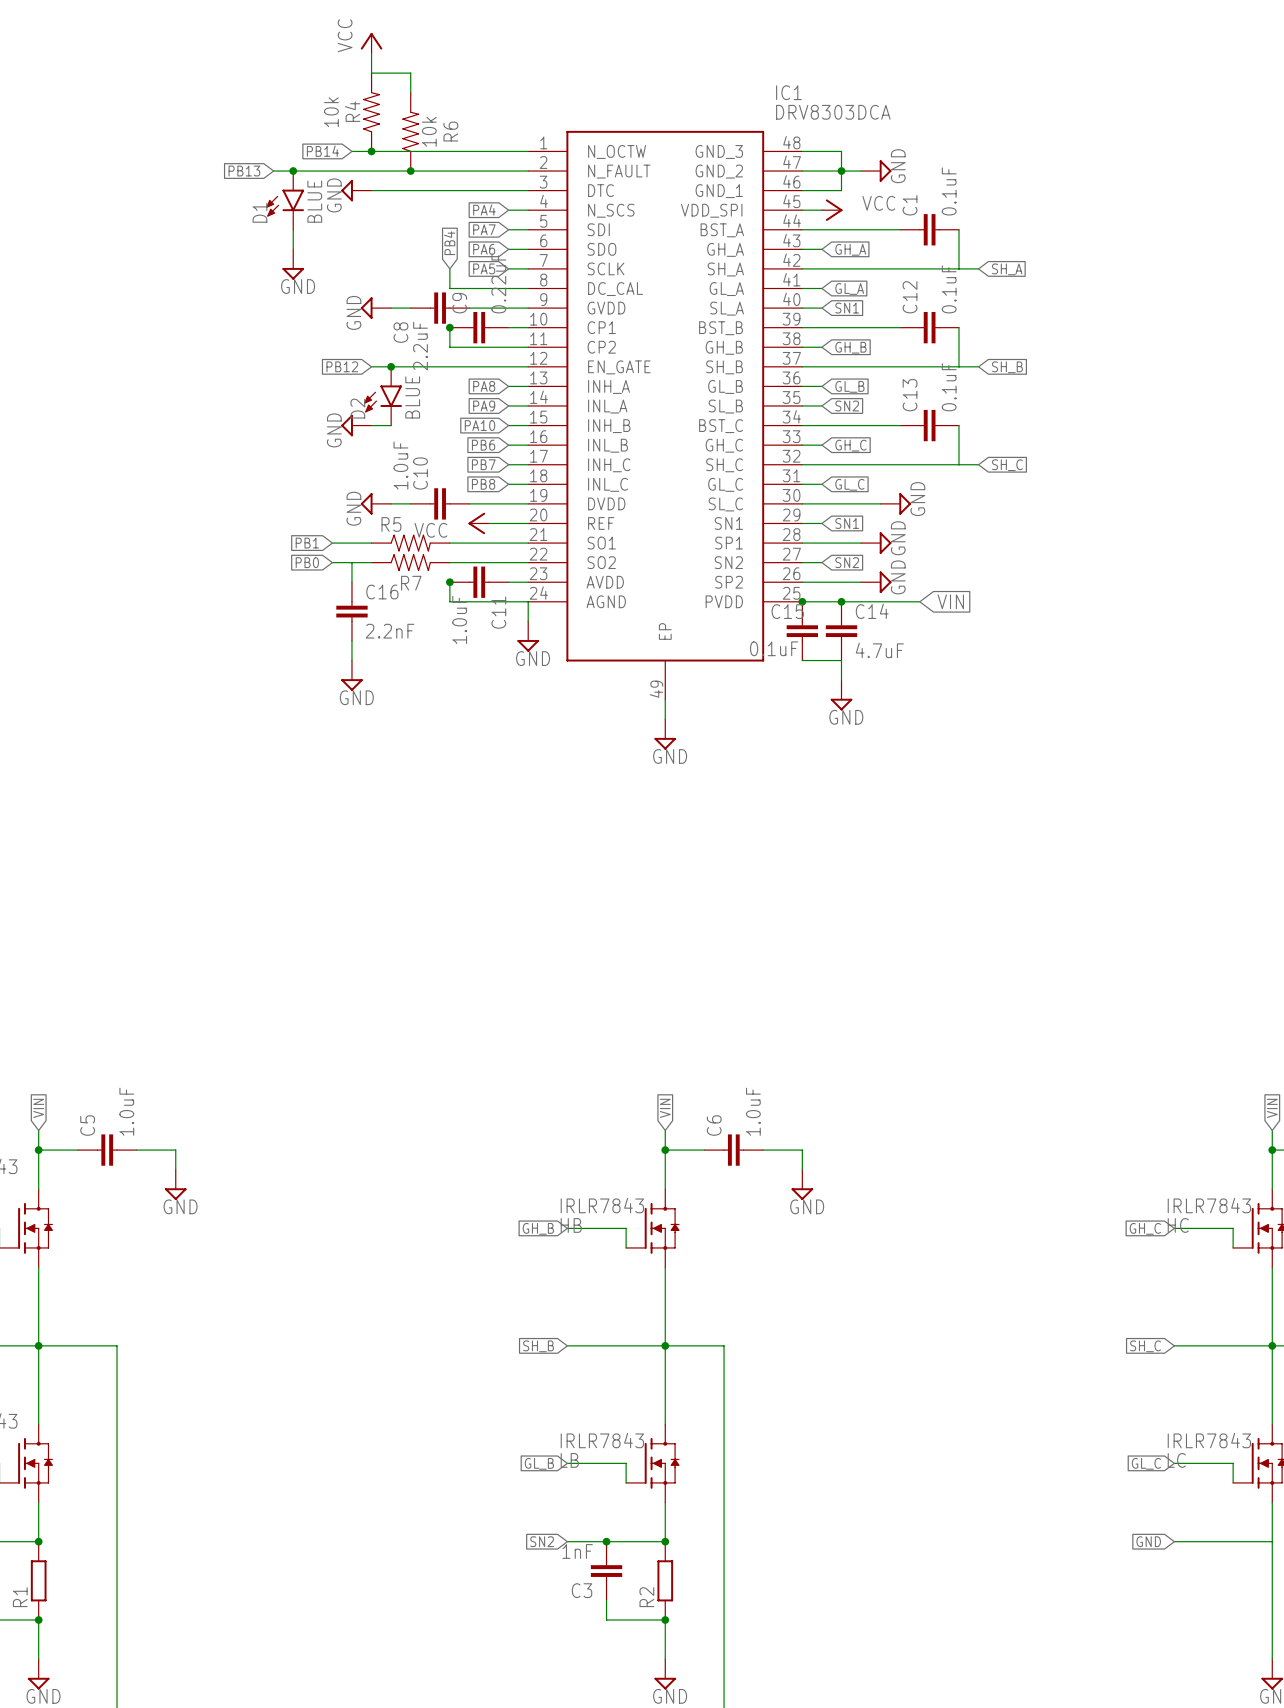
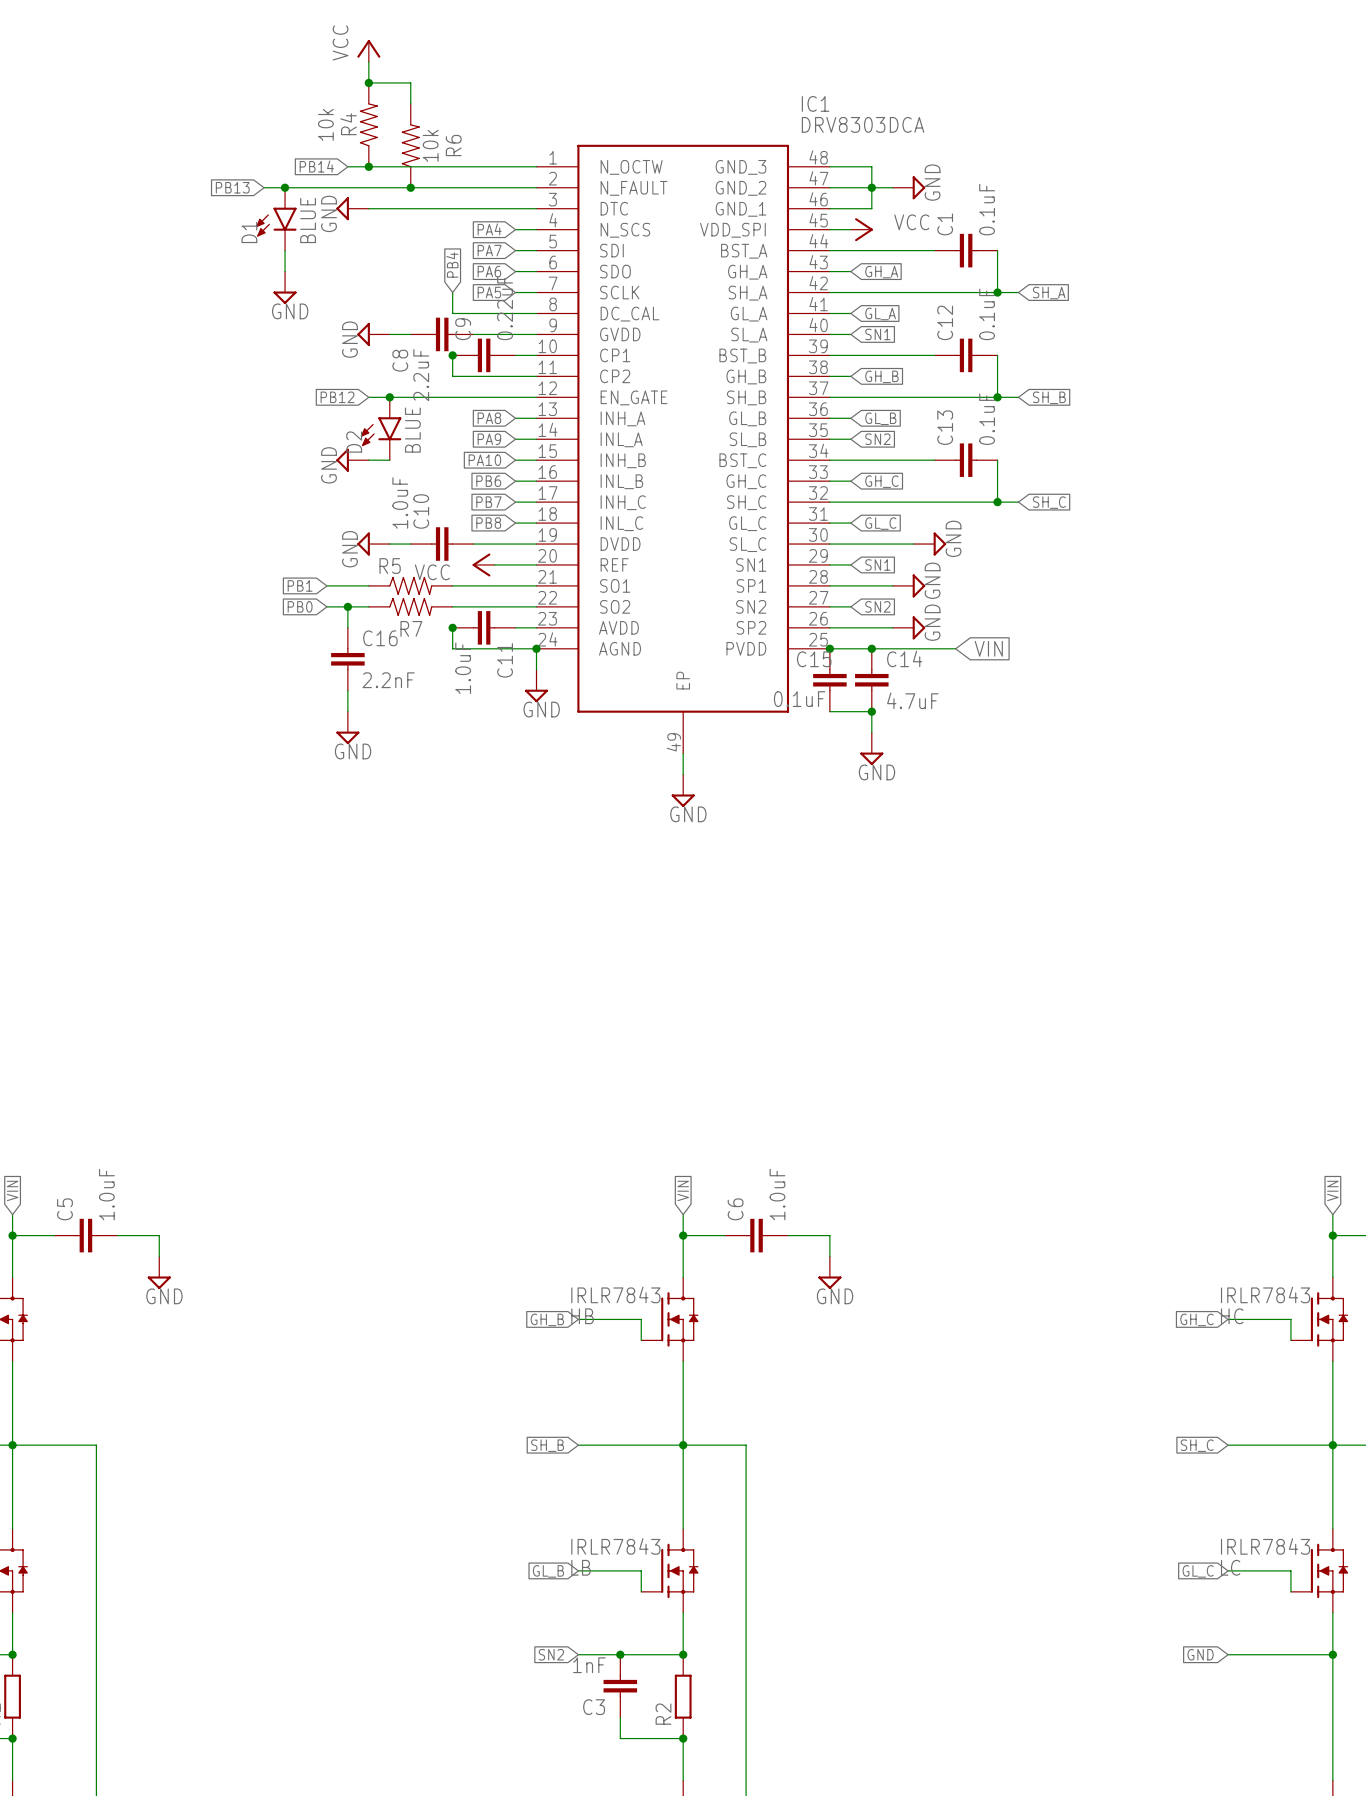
junction: none -> (368, 82)
junction: none -> (997, 292)
junction: none -> (997, 397)
junction: none -> (997, 502)
junction: none -> (347, 606)
junction: none -> (536, 648)
junction: none -> (871, 711)
junction: none -> (1332, 1654)

